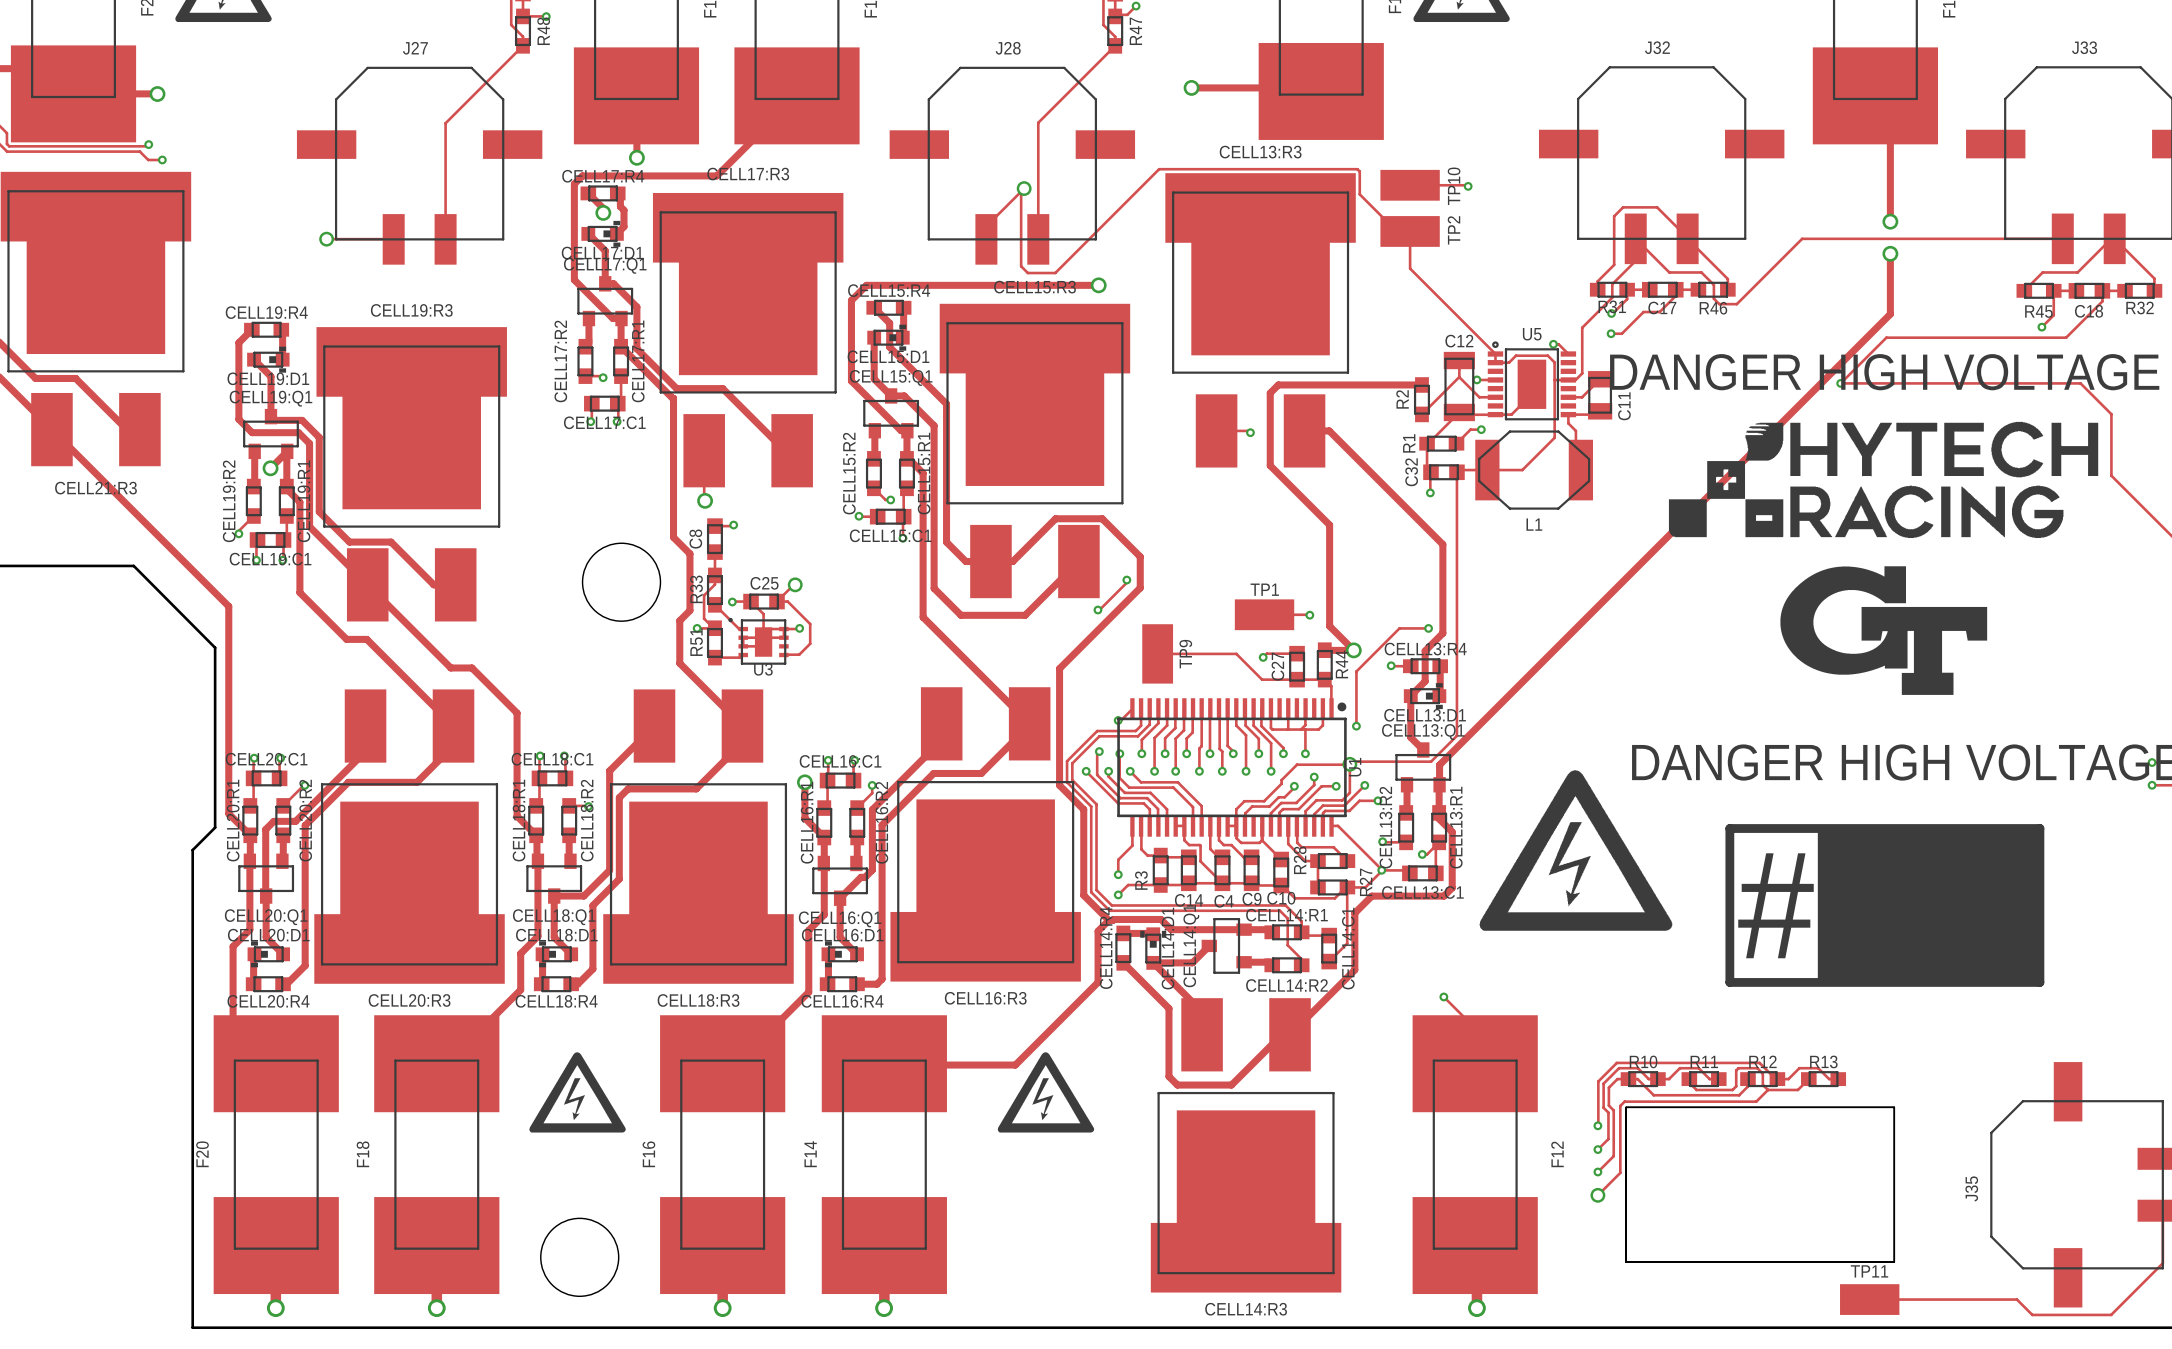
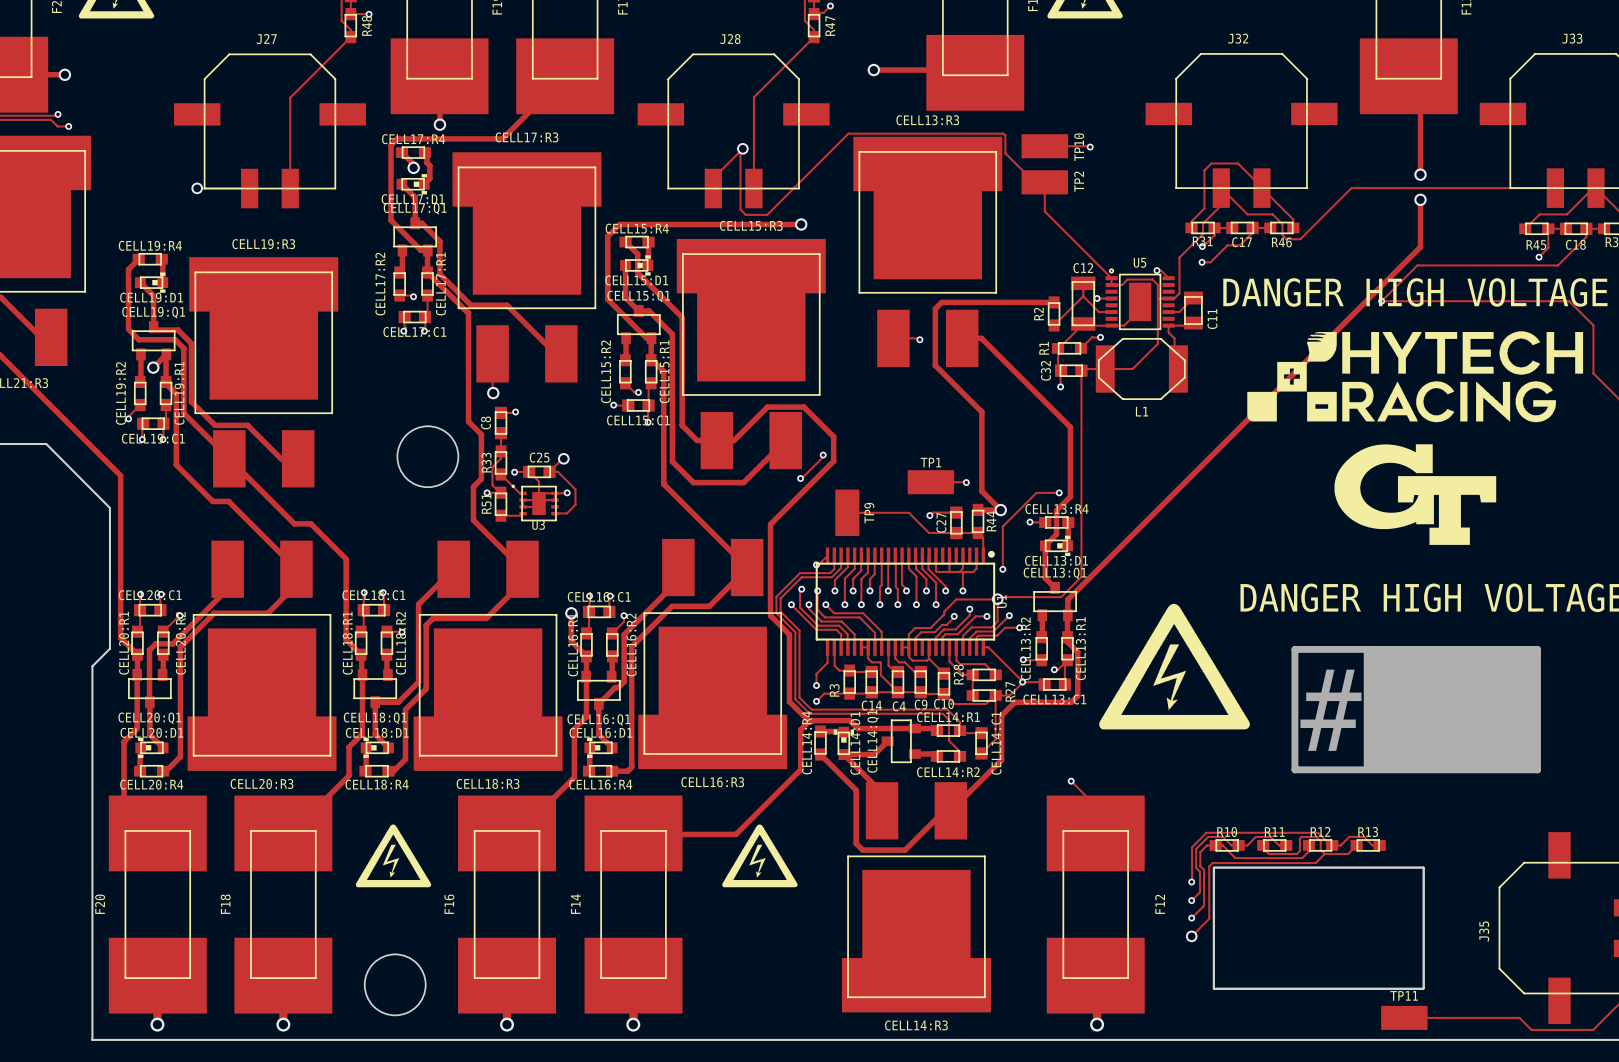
drawing shape: [1725, 824, 2045, 987] -> [1291, 645, 1541, 774]

